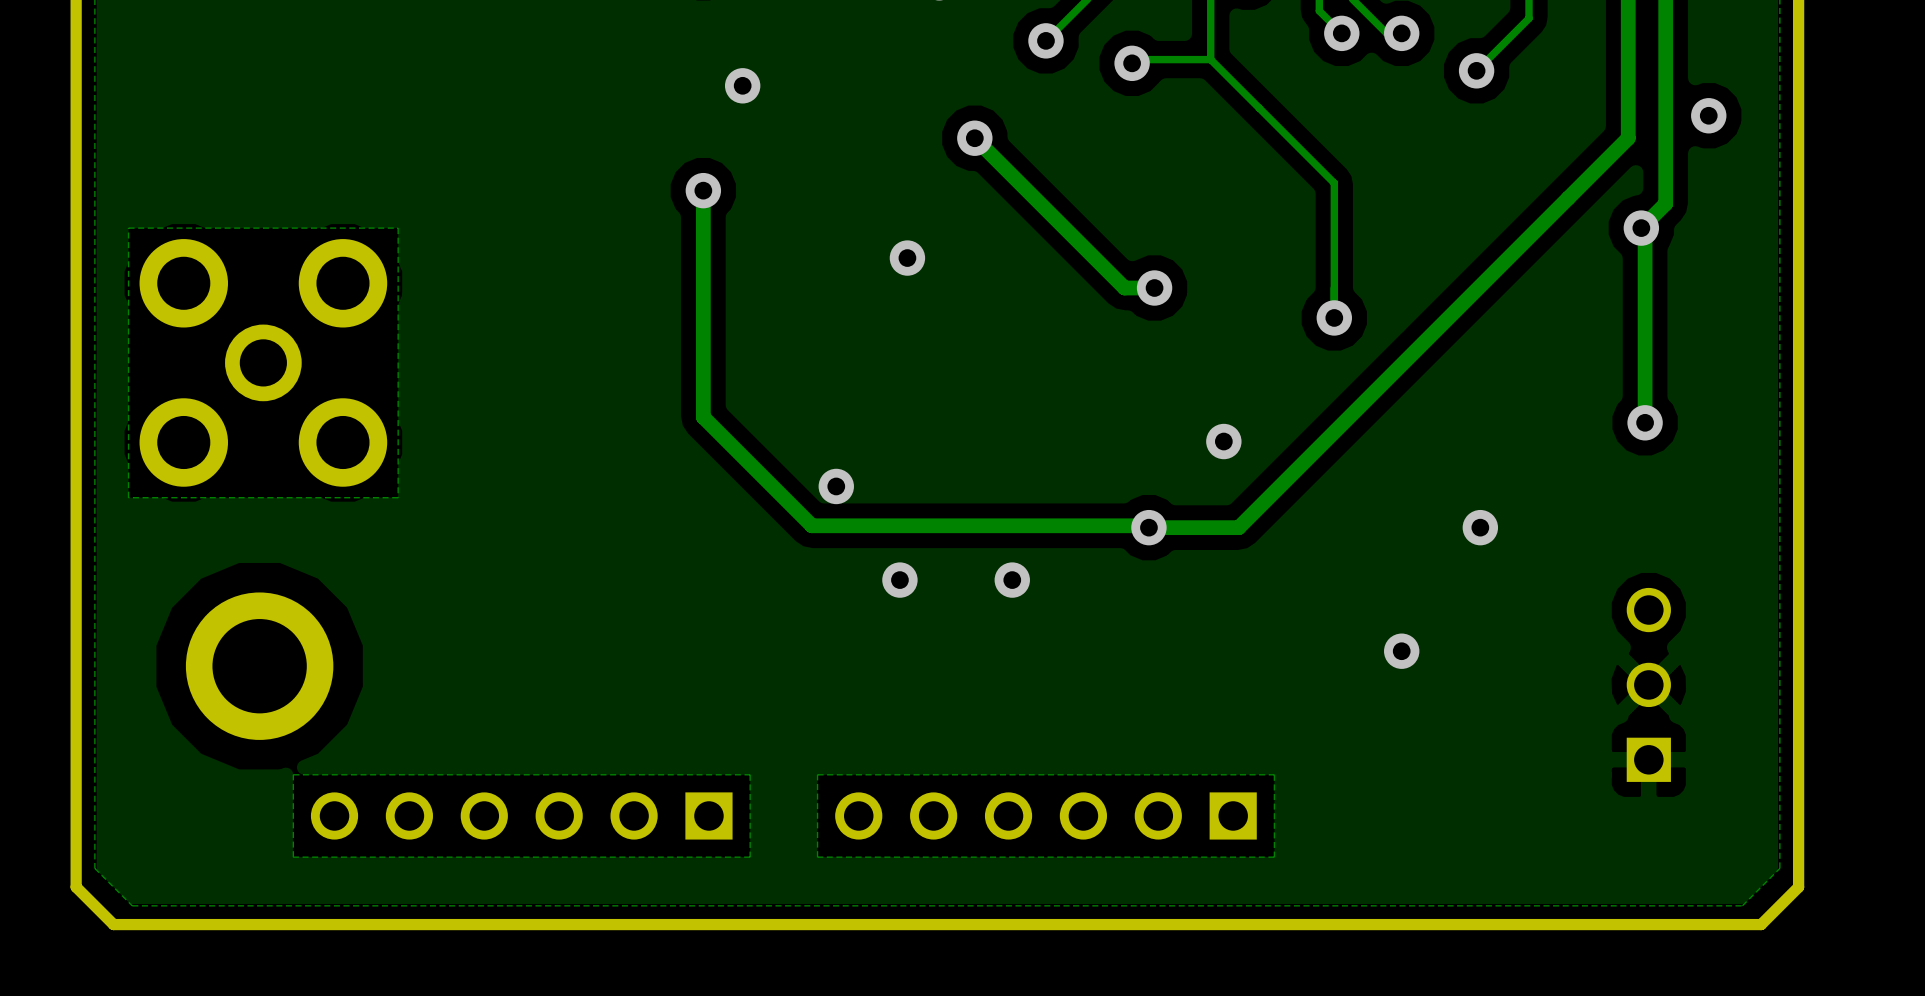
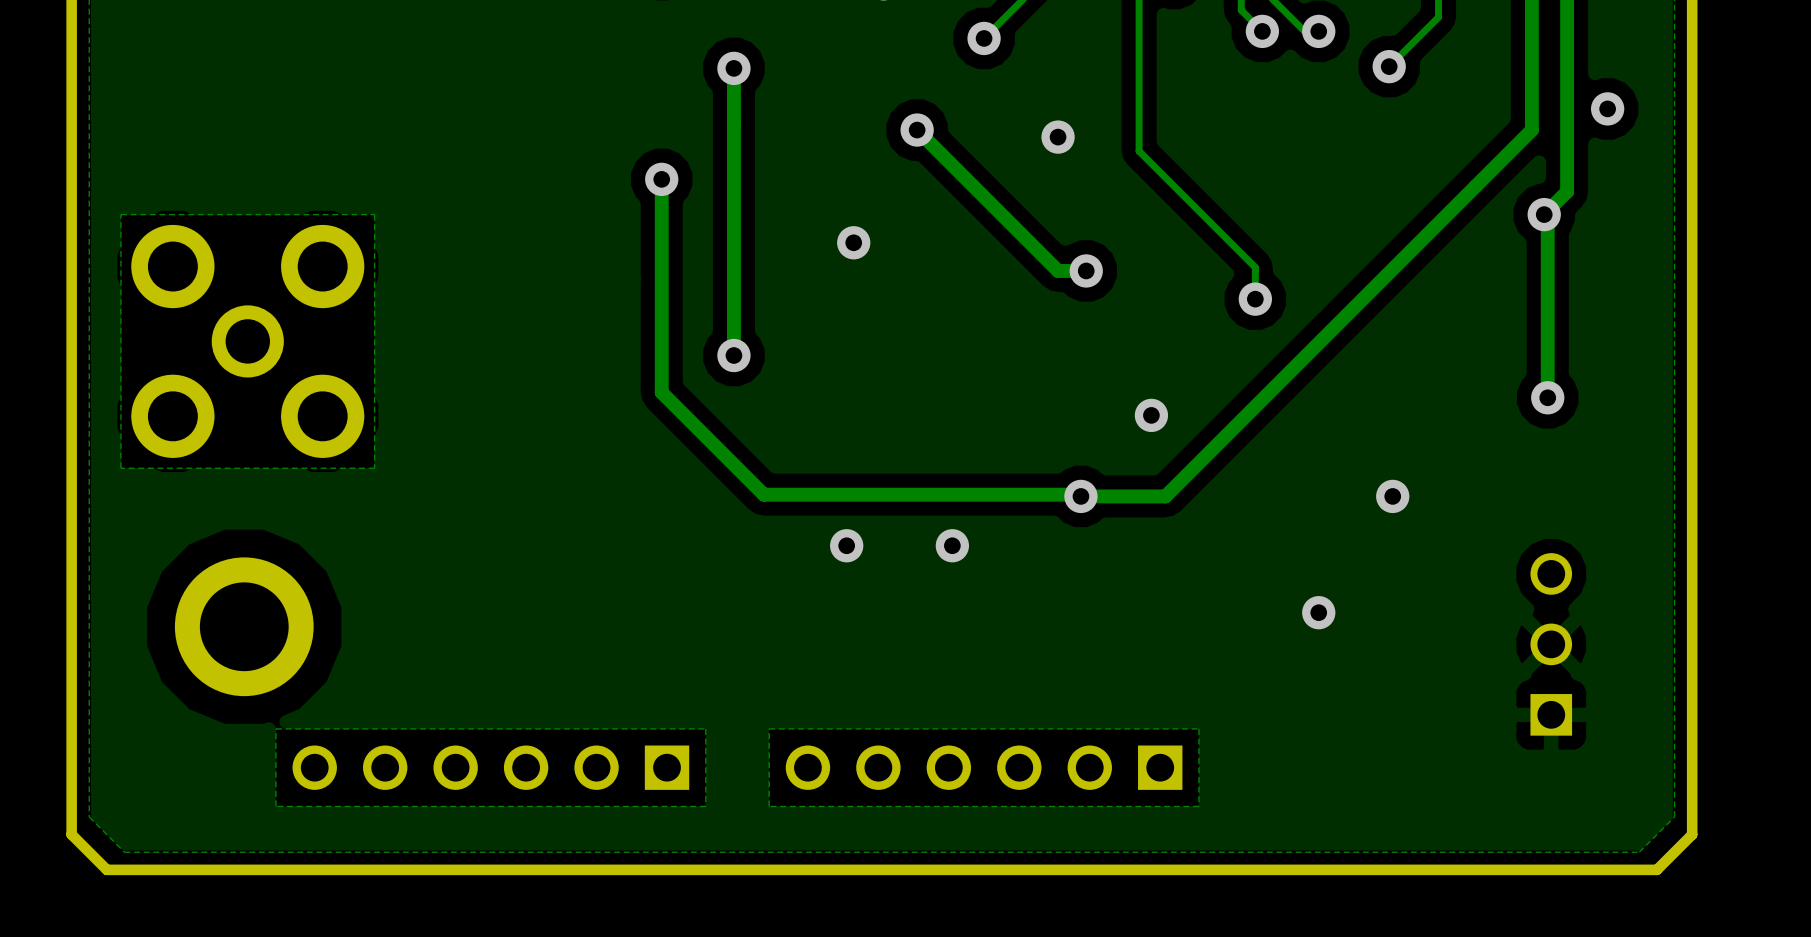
track: (1132, 63) (1135, 59) (1210, 59) (1334, 183) (1334, 284) -> (1139, 56) (1139, 151) (1255, 267)
via position: (1132, 63) -> (1058, 137)
track: none -> (733, 68) (733, 355)
via position: (742, 85) -> (733, 68)
via position: (836, 486) -> (733, 355)

